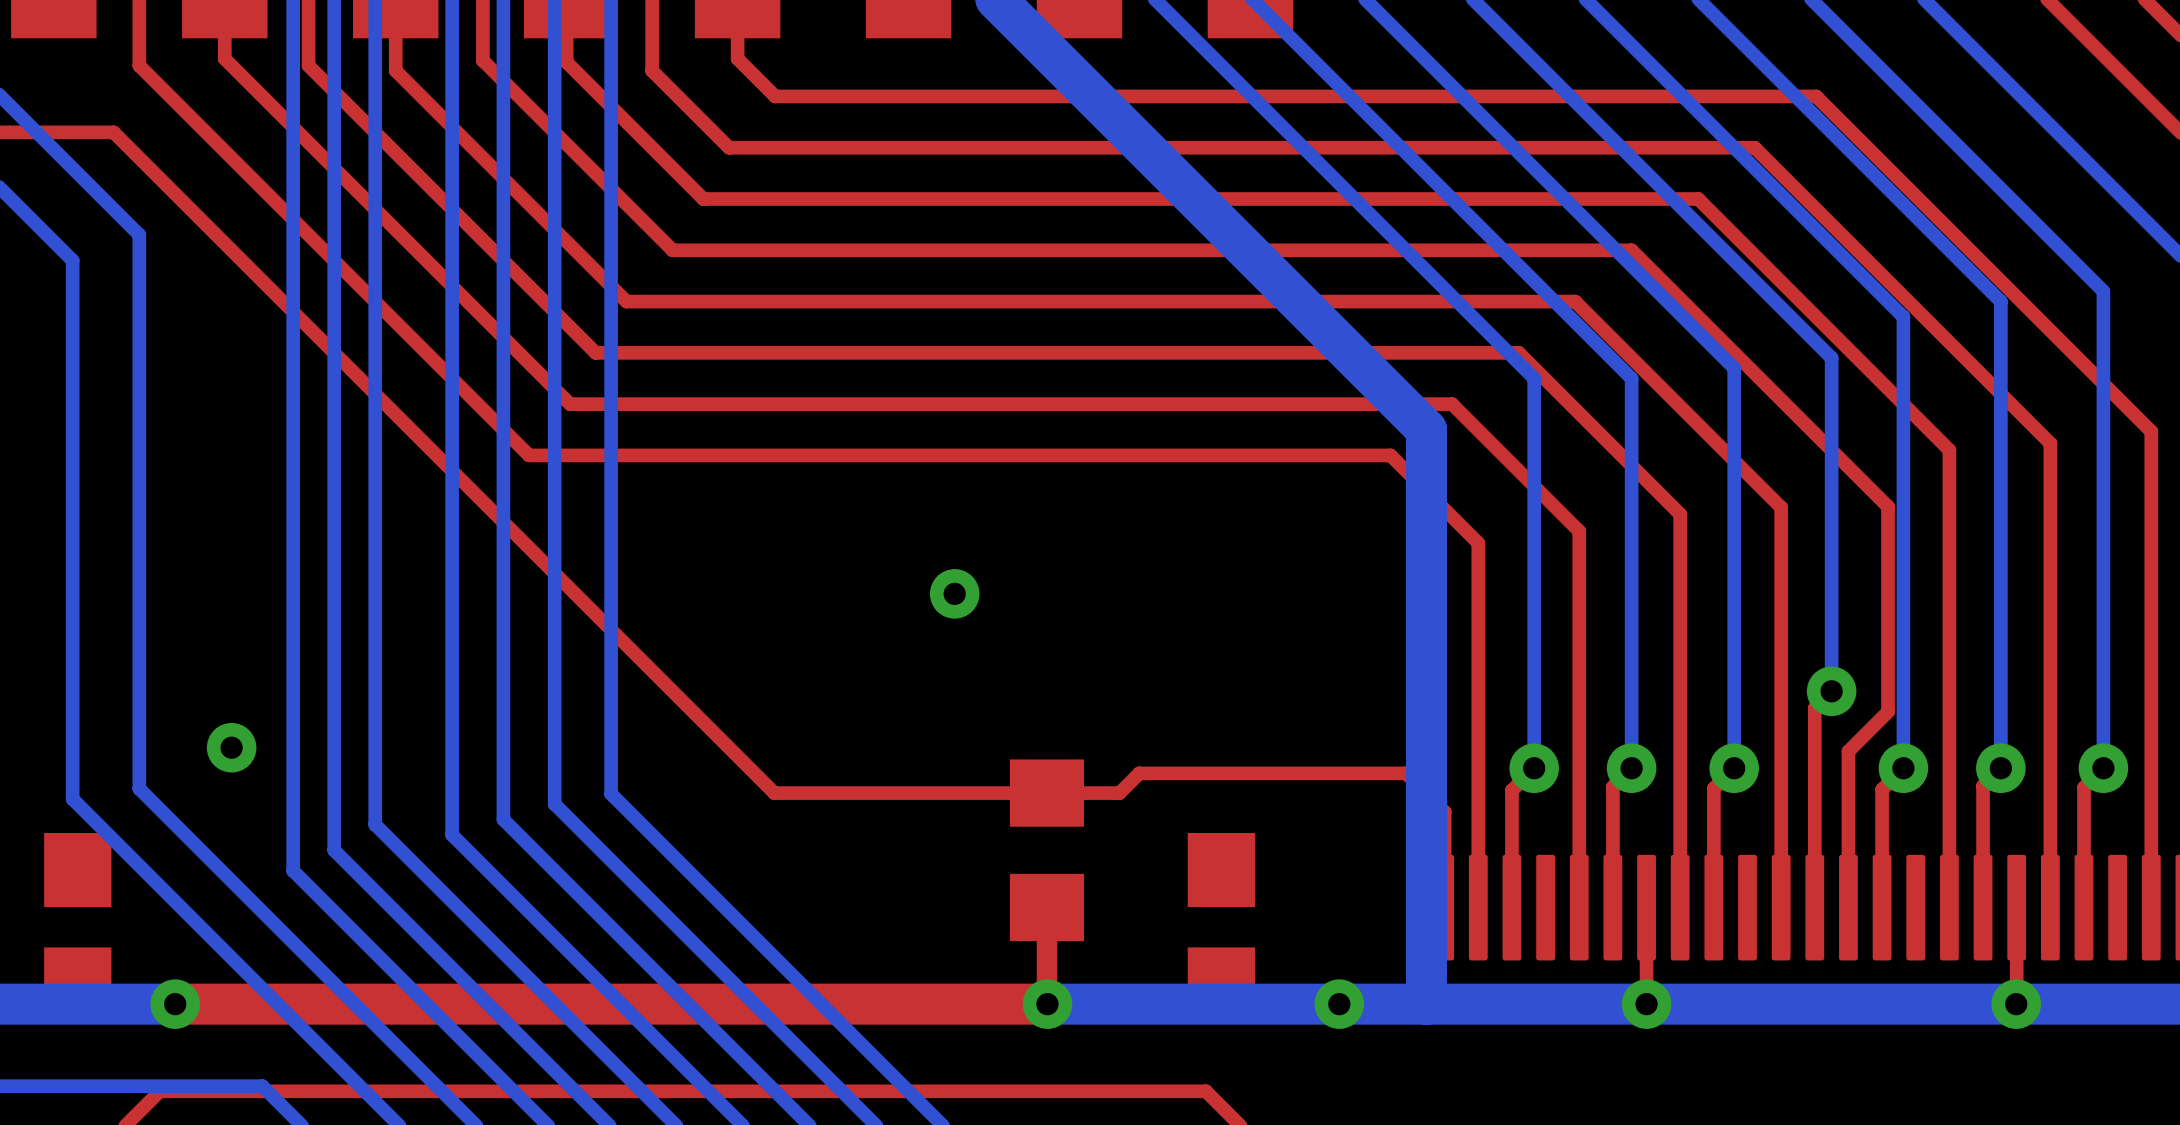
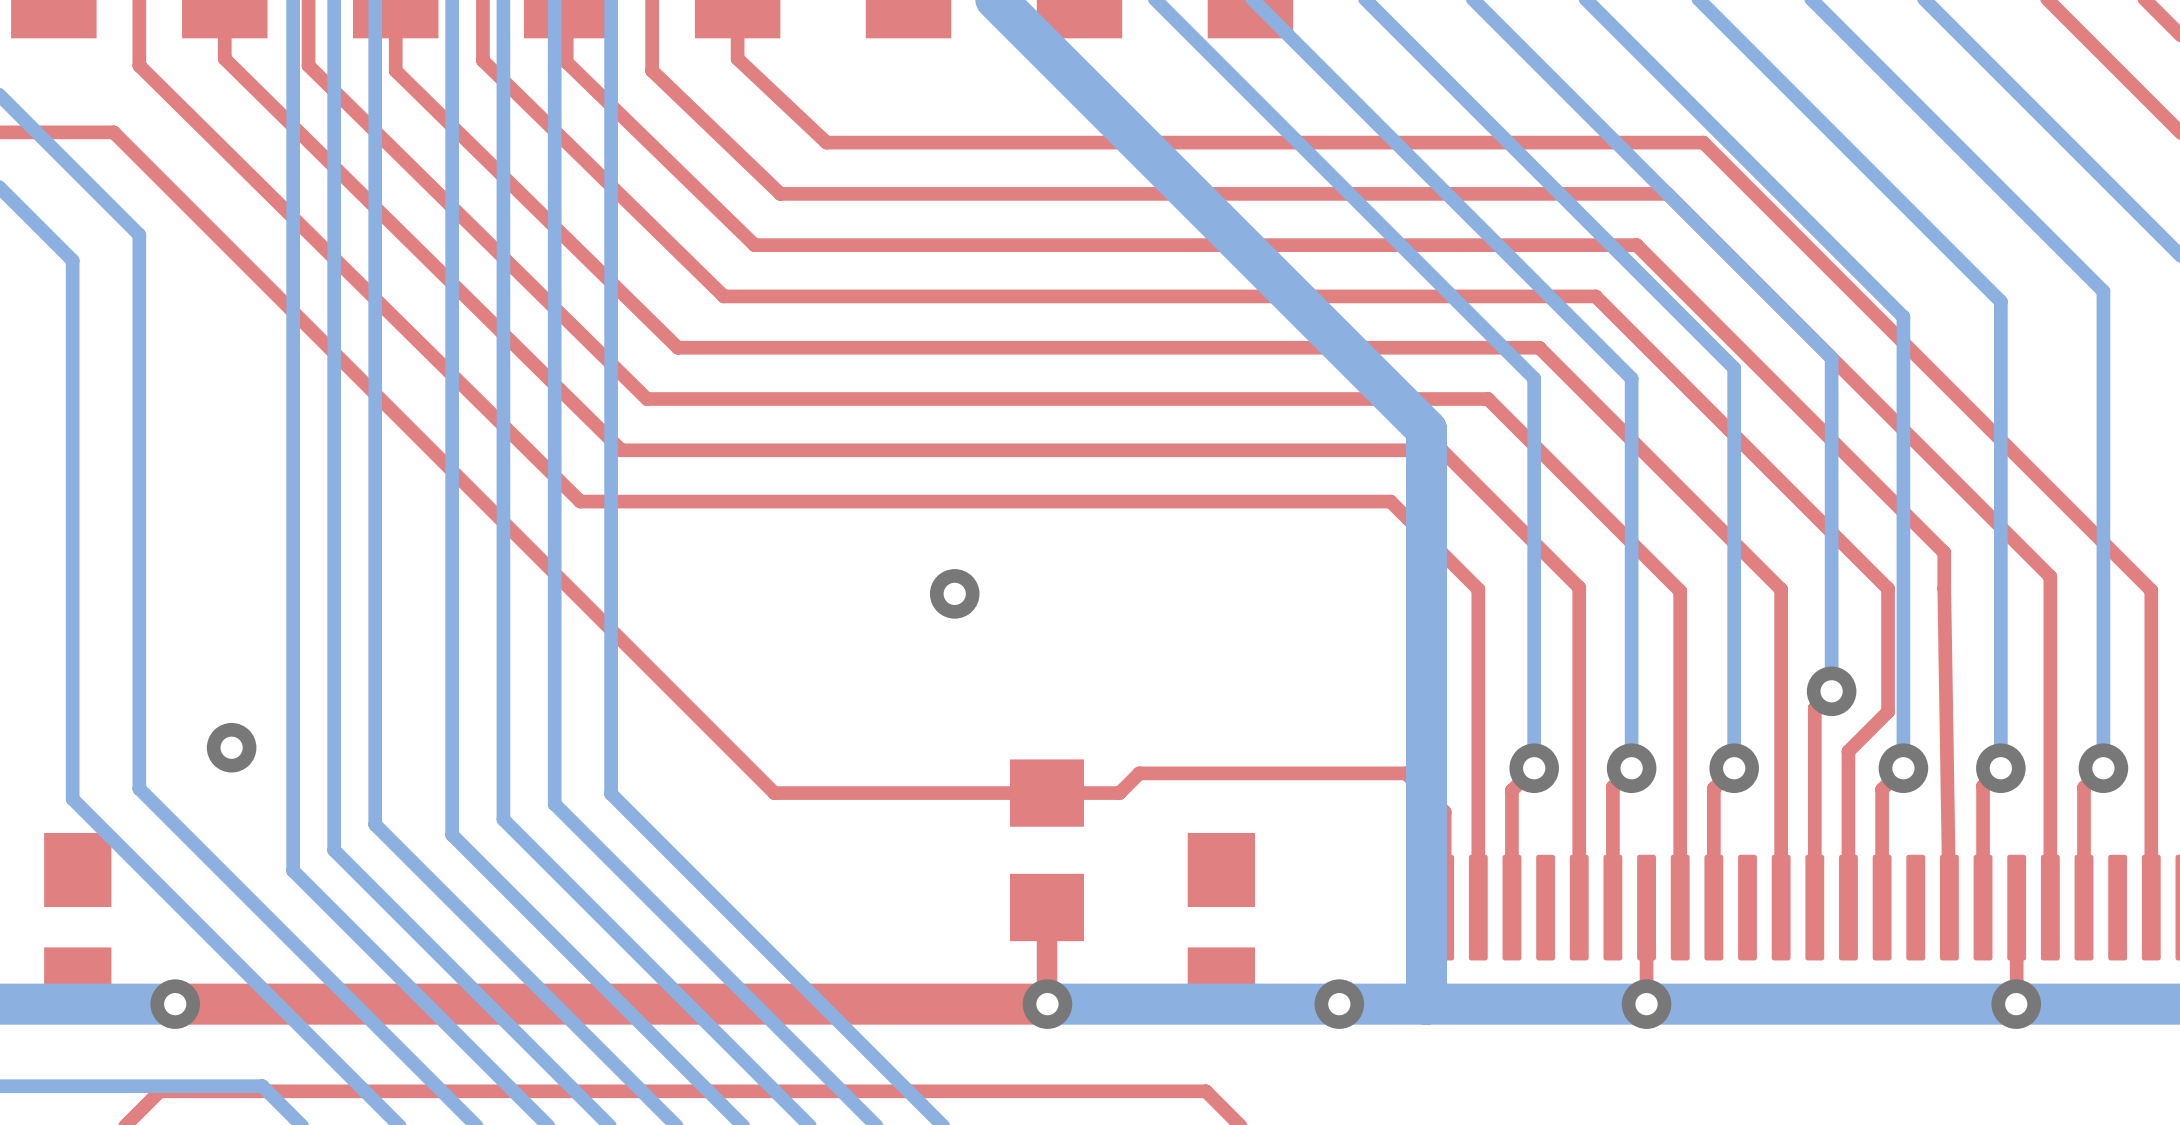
top track: (224, 58) (570, 404) (1452, 404) (1579, 531) (1579, 587) -> (224, 58) (621, 450) (1441, 450) (1579, 587)
top track: (737, 58) (775, 96) (1816, 96) (2151, 431) (2151, 590) -> (737, 58) (826, 142) (1703, 142) (2151, 590)
top track: (482, 60) (672, 250) (1631, 250) (1888, 506) (1888, 588) -> (482, 60) (723, 296) (1595, 296) (1888, 588)
top track: (566, 62) (703, 199) (1698, 199) (1949, 450) (1949, 907) -> (566, 62) (754, 245) (1636, 245) (1944, 552) (1949, 907)
top track: (139, 65) (529, 455) (1390, 455) (1478, 543) (1478, 589) -> (139, 65) (580, 501) (1390, 501) (1478, 589)
top track: (308, 65) (595, 352) (1518, 352) (1680, 514) (1680, 591) -> (308, 65) (647, 399) (1488, 399) (1680, 591)
top track: (395, 70) (626, 301) (1575, 301) (1781, 507) (1781, 589) -> (395, 70) (677, 347) (1539, 347) (1781, 589)
top track: (652, 70) (729, 147) (1754, 147) (2050, 443) (2050, 576) -> (652, 70) (780, 193) (1667, 193) (2050, 576)

